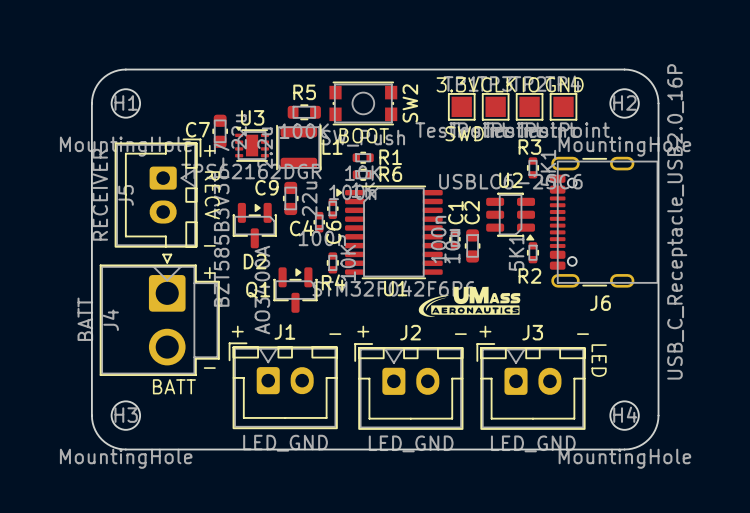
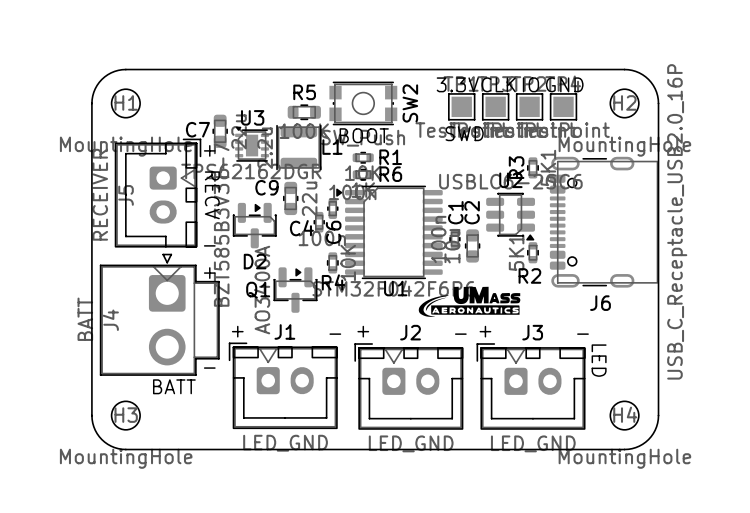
R3 name rotation: 0° (529, 147) -> 90° counterclockwise (516, 167)

